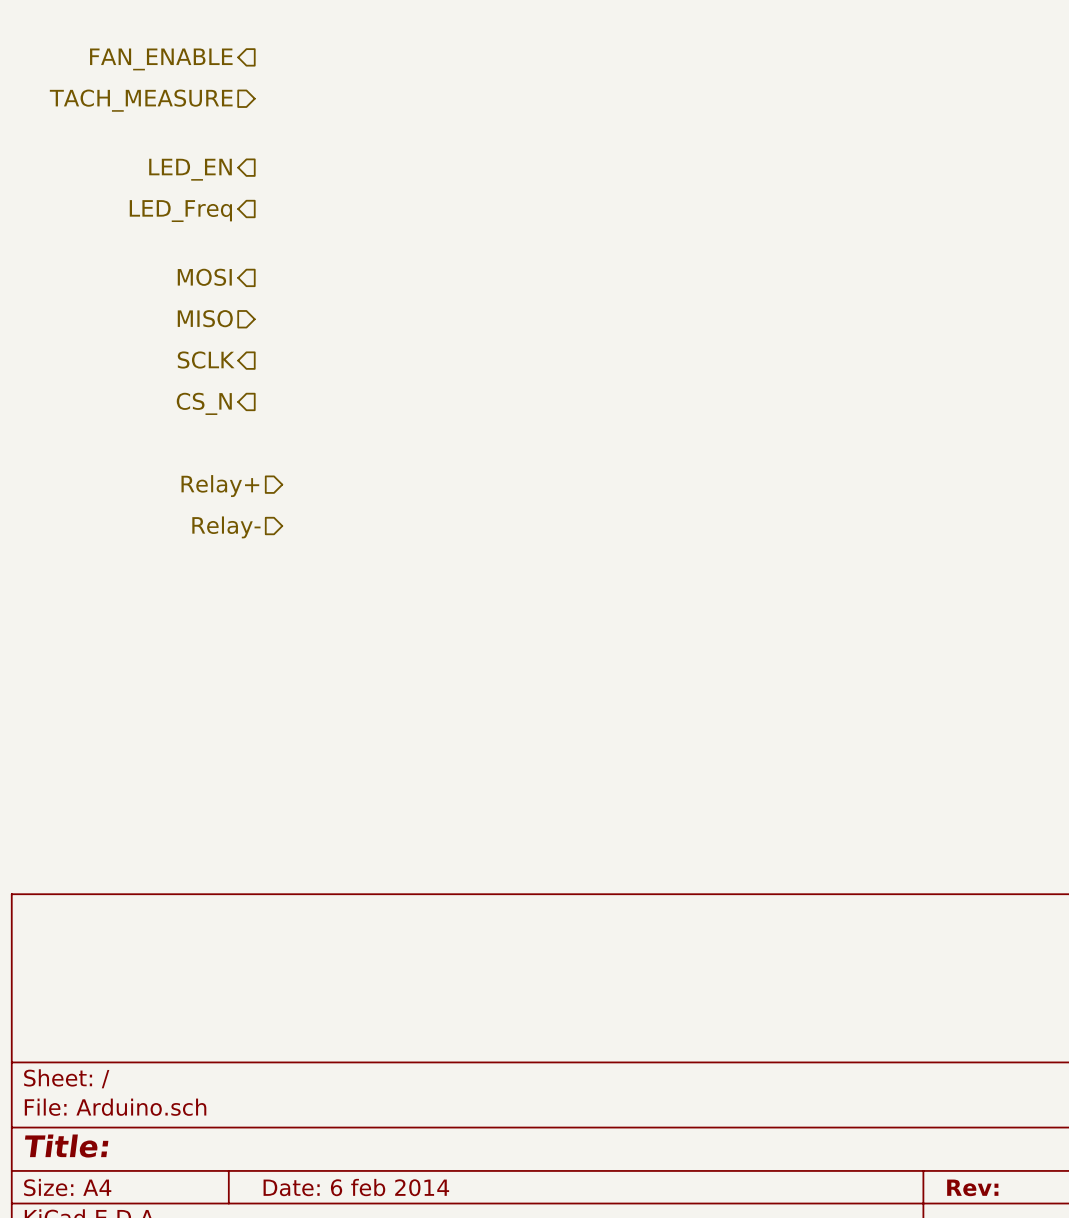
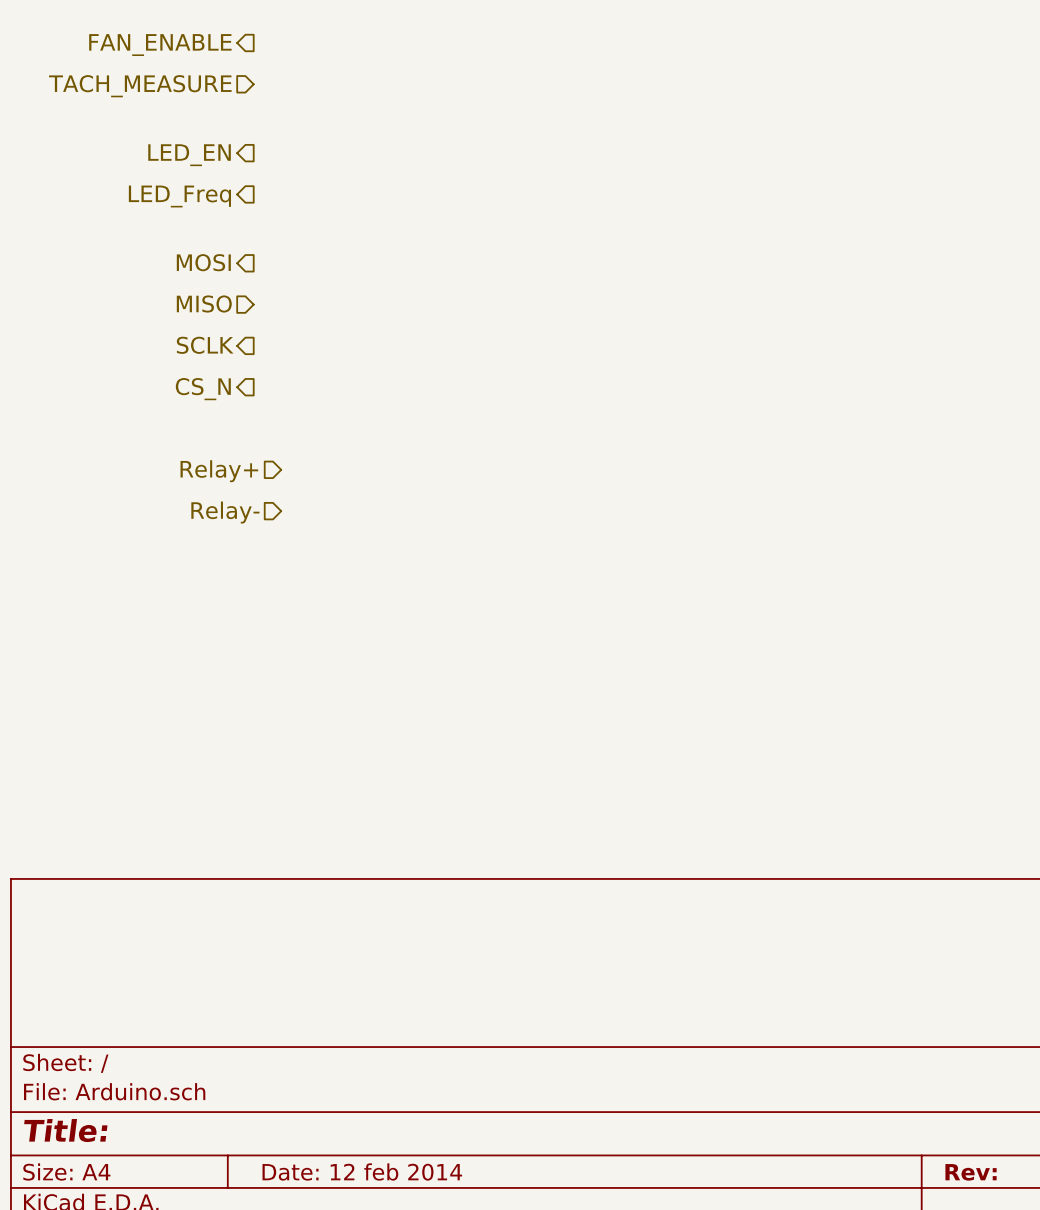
title block: Date: 6 feb 2014 (356, 1187) -> Date: 12 feb 2014 (362, 1171)

